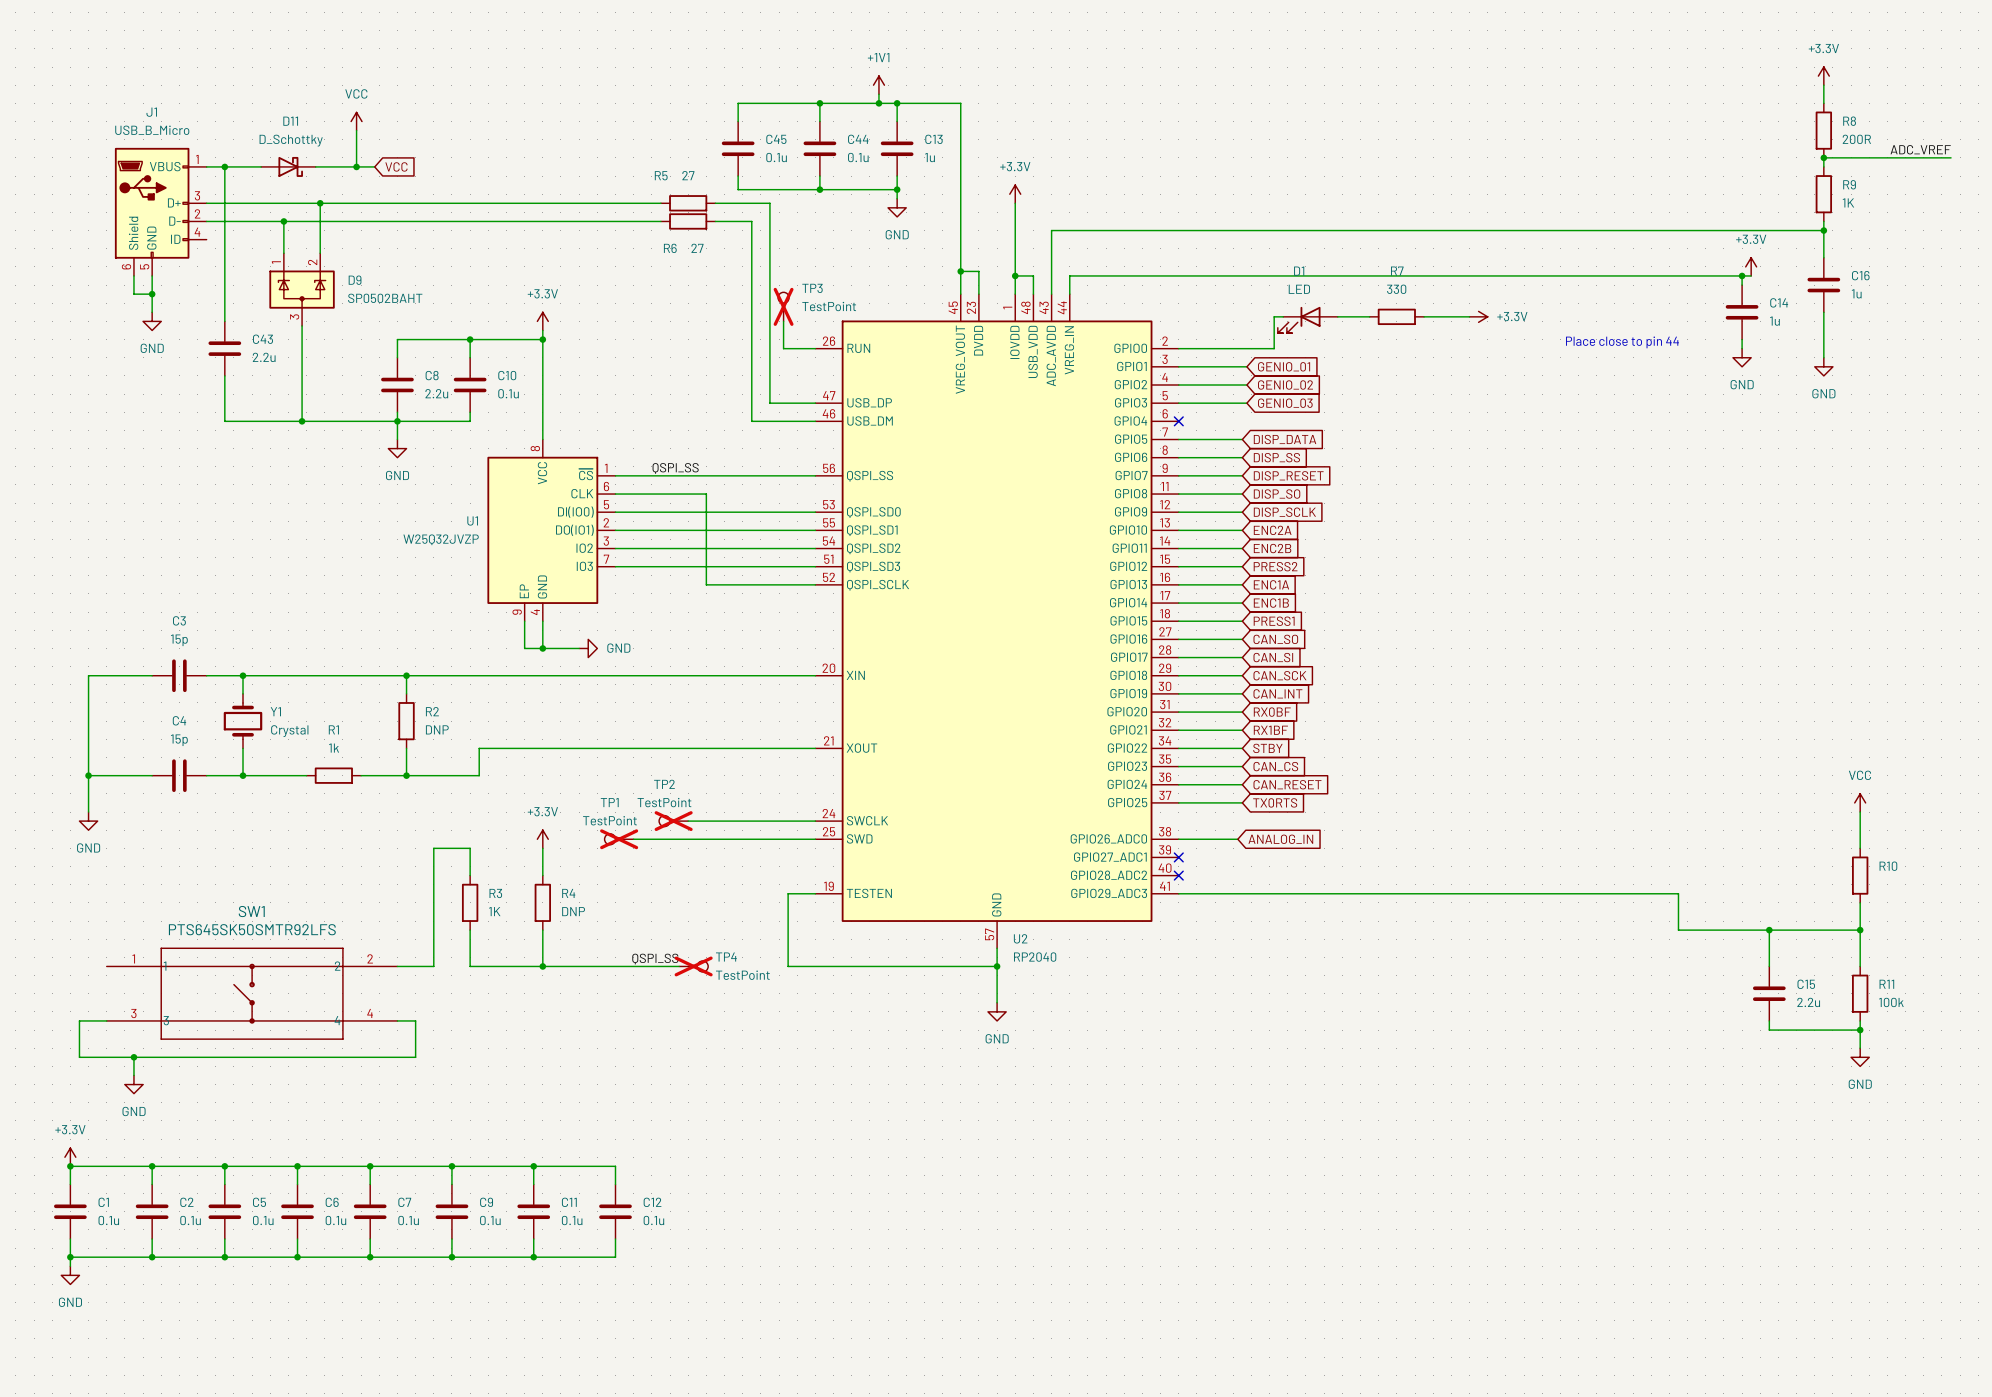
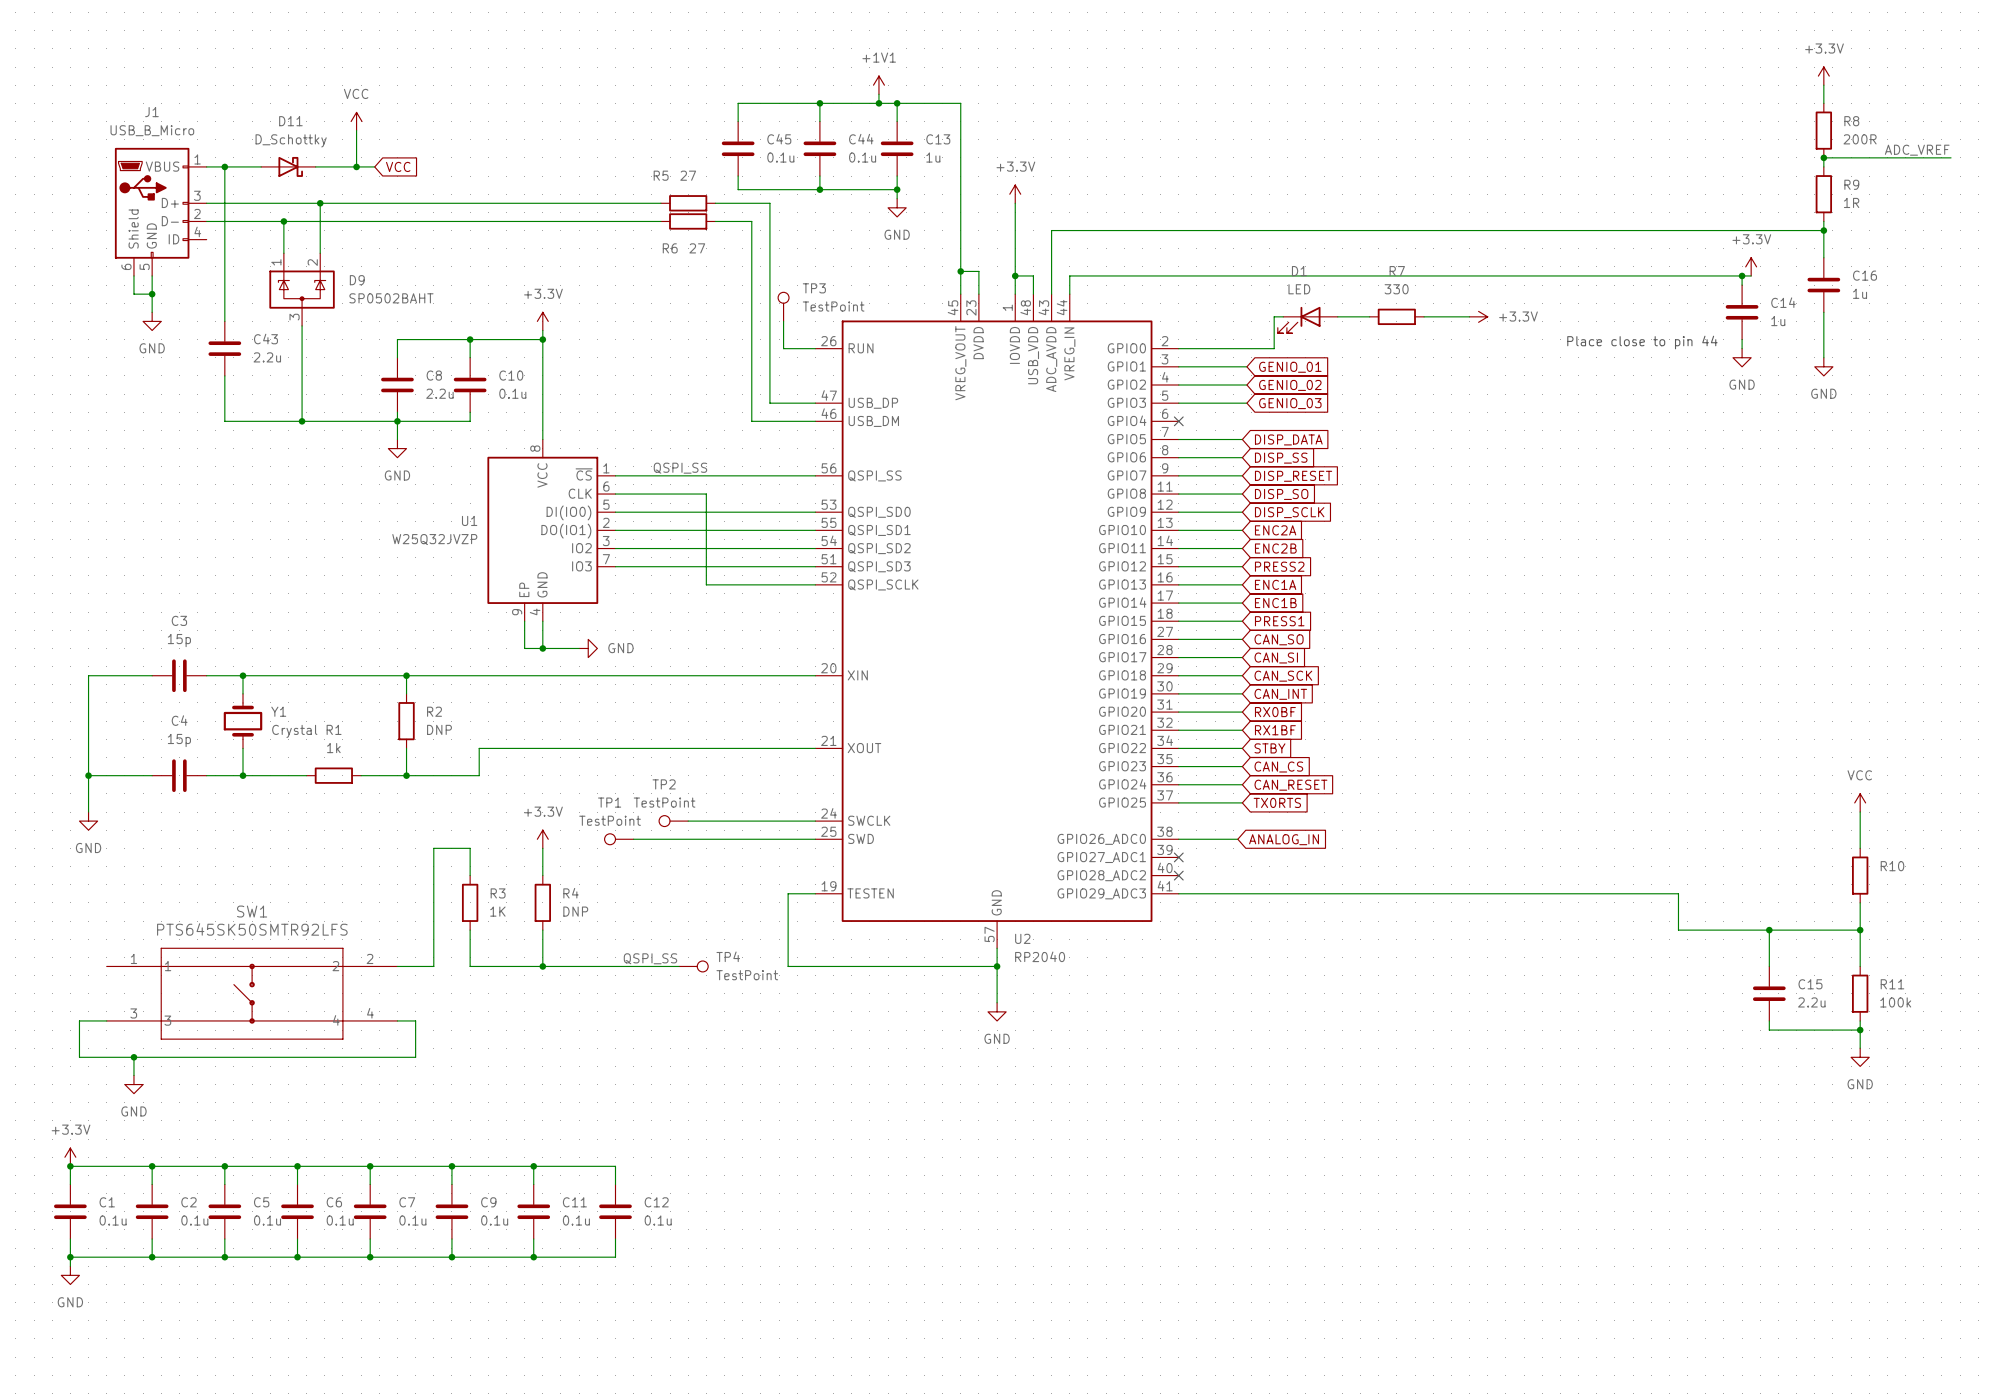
R9 value: 1K (1848, 202) -> 1R (1851, 202)
TP3 do-not-place cross: (783, 306) -> none
TP2 do-not-place cross: (673, 821) -> none
TP1 do-not-place cross: (619, 839) -> none
TP4 do-not-place cross: (693, 966) -> none

